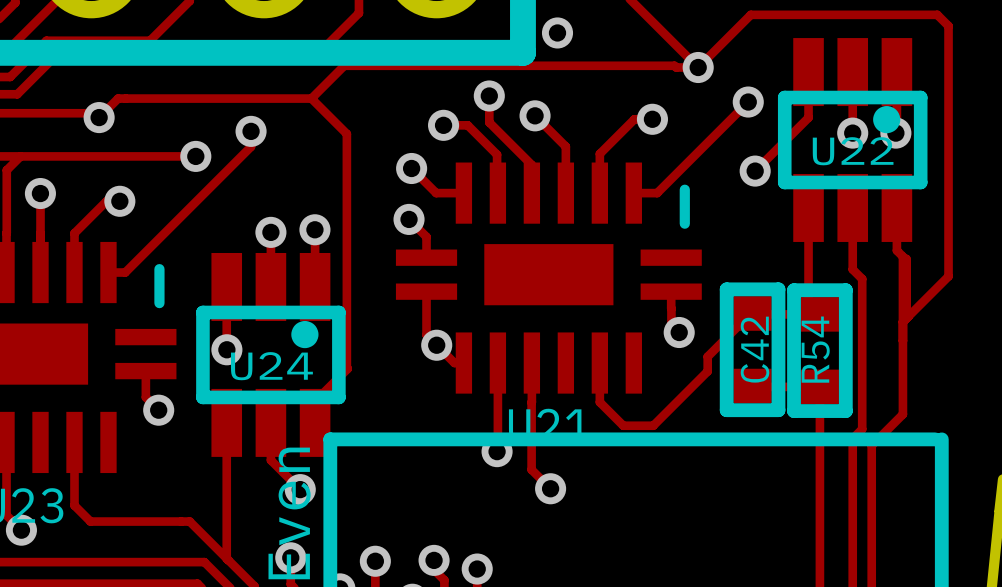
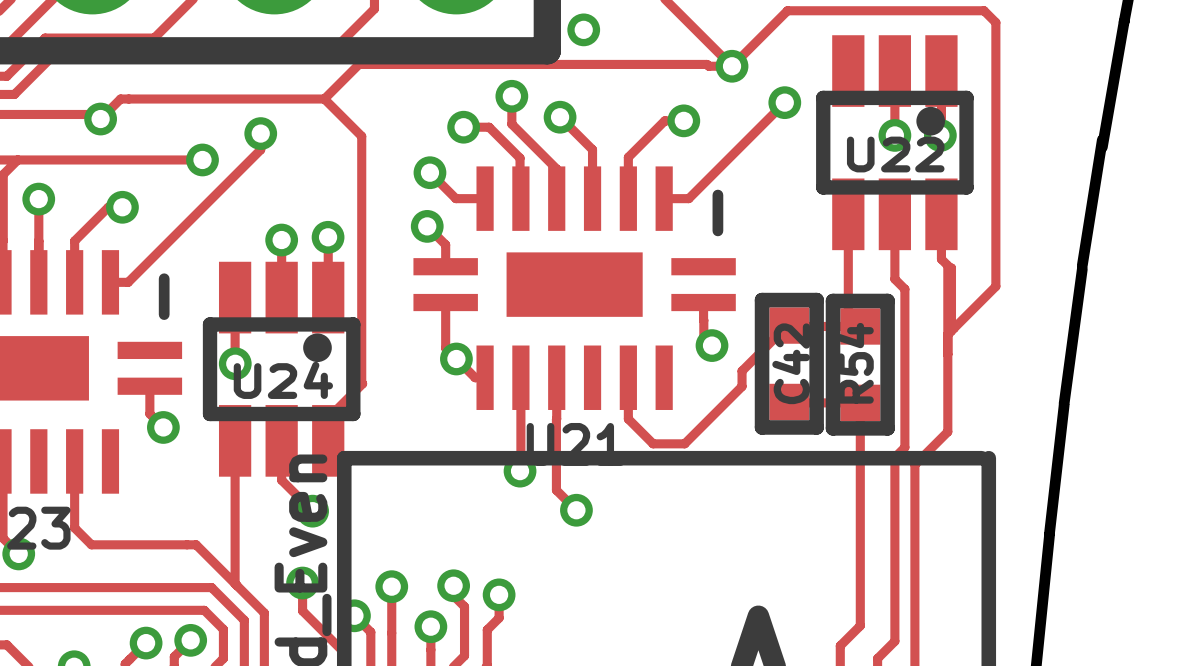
track: (808, 72) (808, 117) (755, 171) -> none
via: (755, 171) -> none

